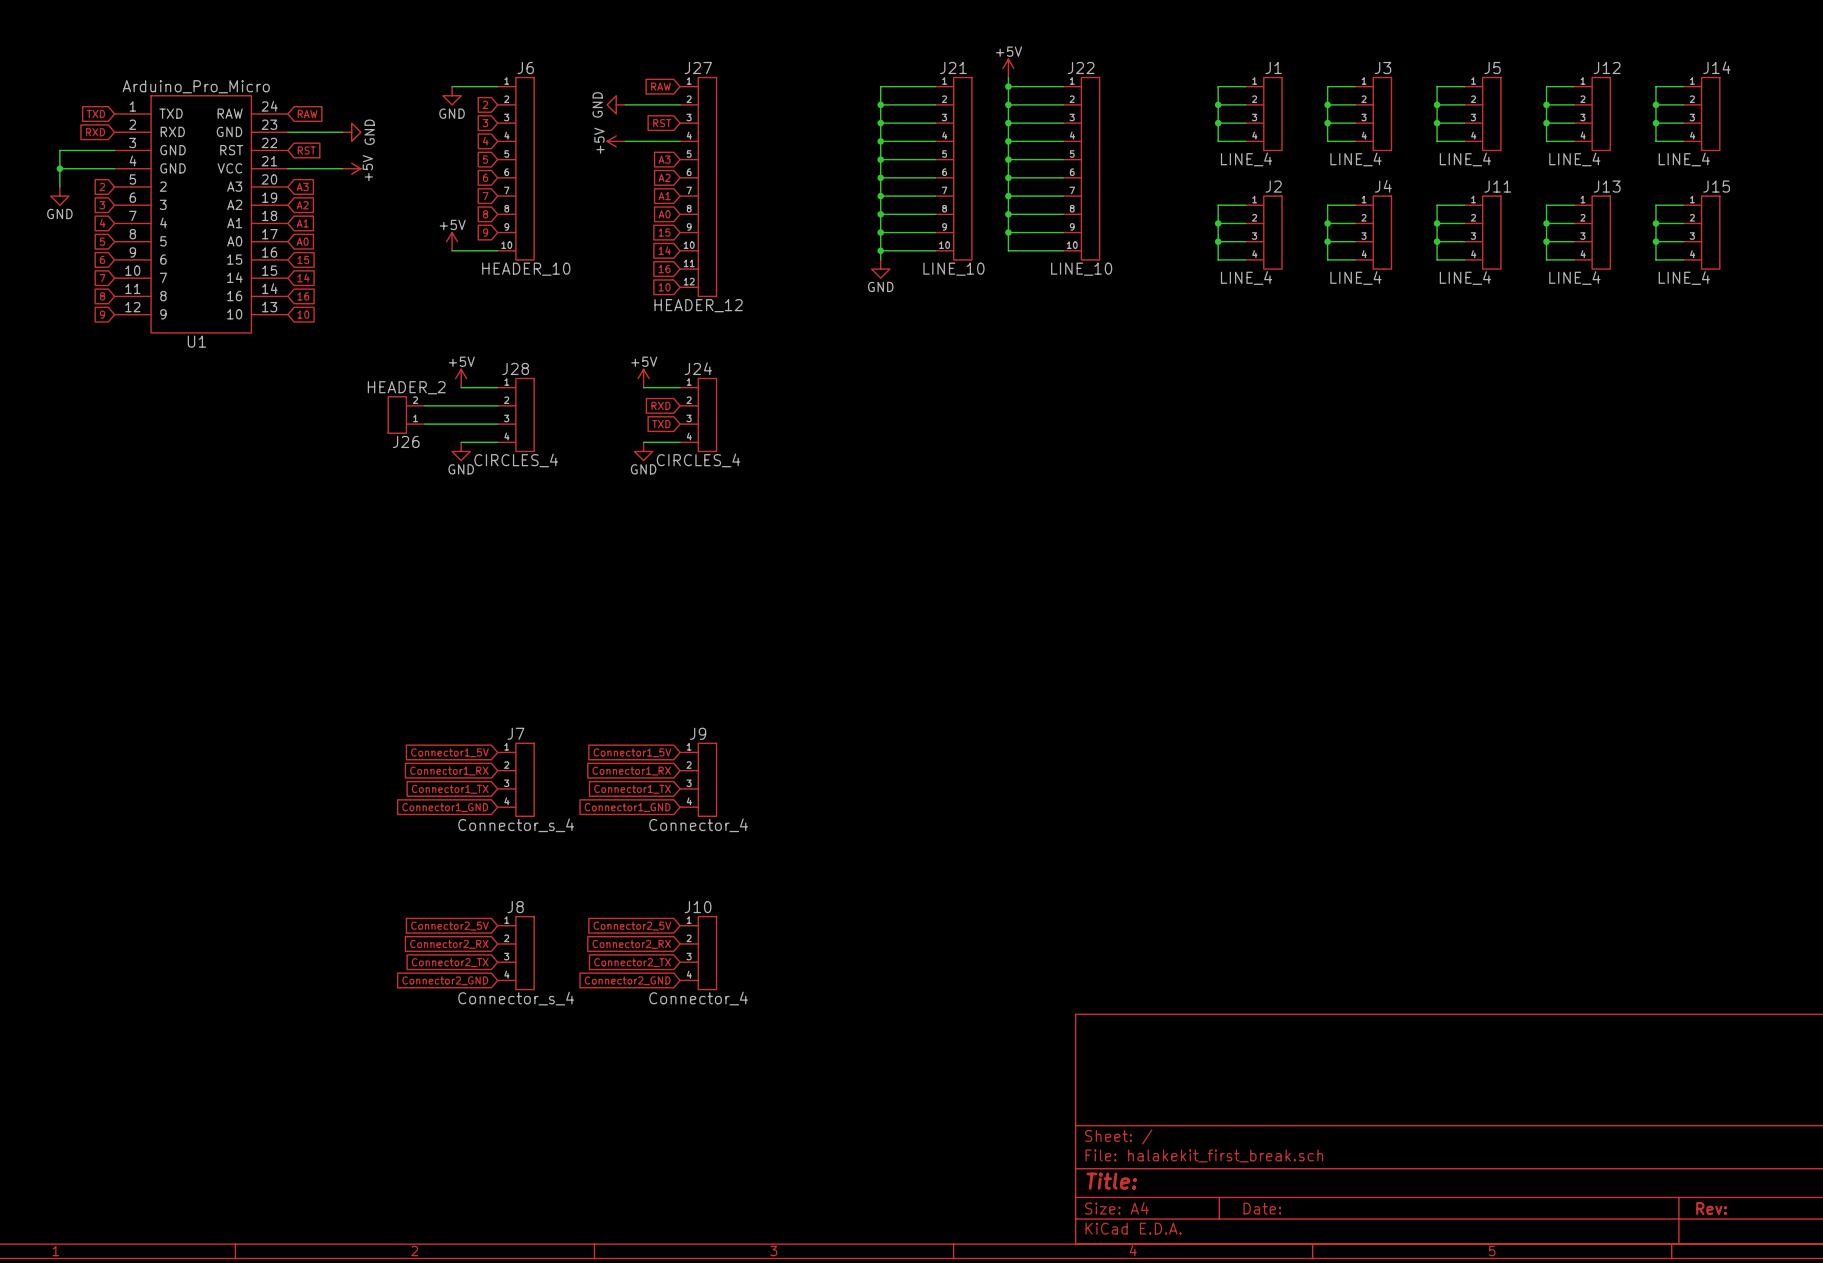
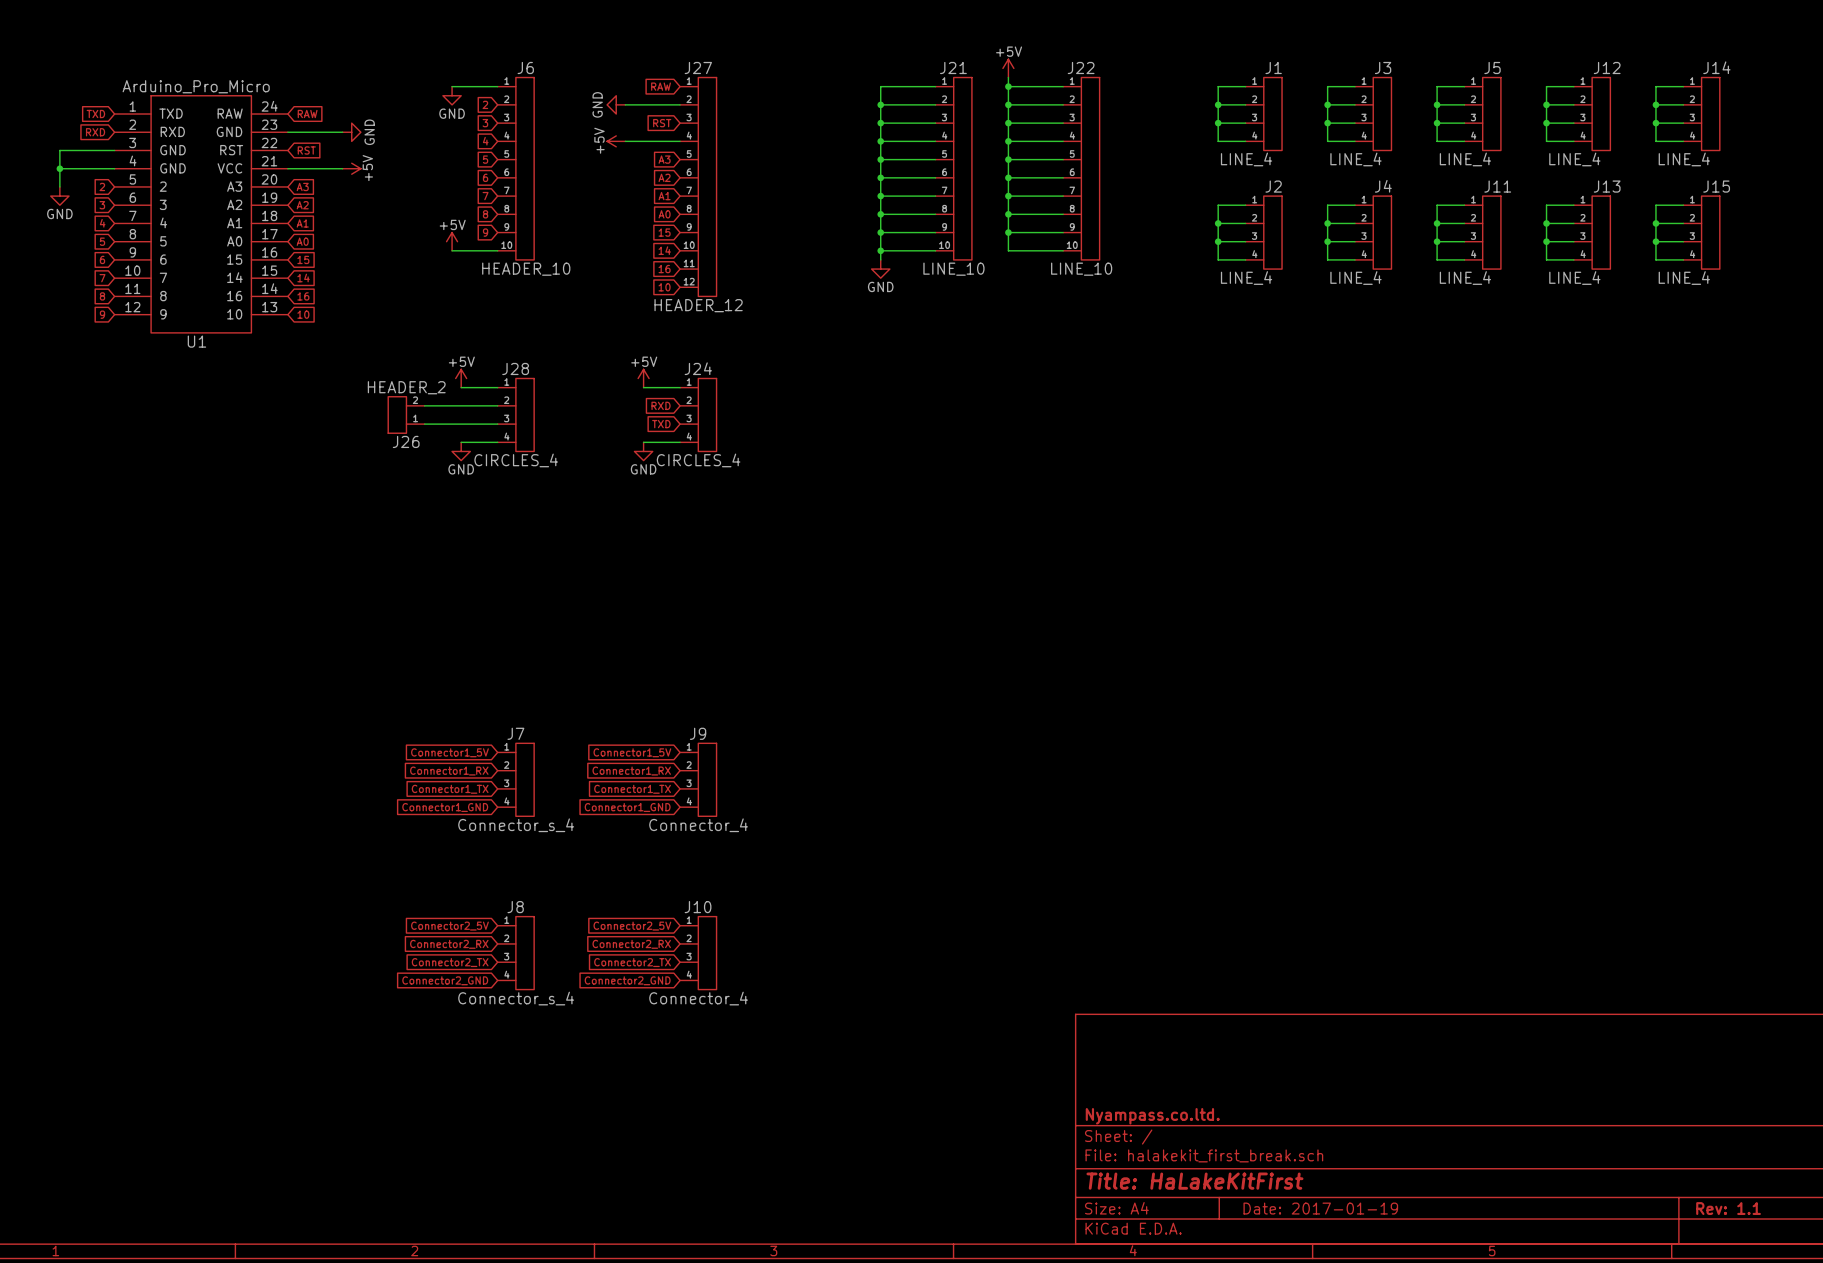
title block: none -> Nyampass.co.ltd. (1152, 1116)
title block: Title: (1111, 1181) -> Title: HaLakeKitFirst (1194, 1181)
title block: Date: (1262, 1208) -> Date: 2017-01-19 (1320, 1208)
title block: Rev: (1711, 1208) -> Rev: 1.1 (1728, 1208)

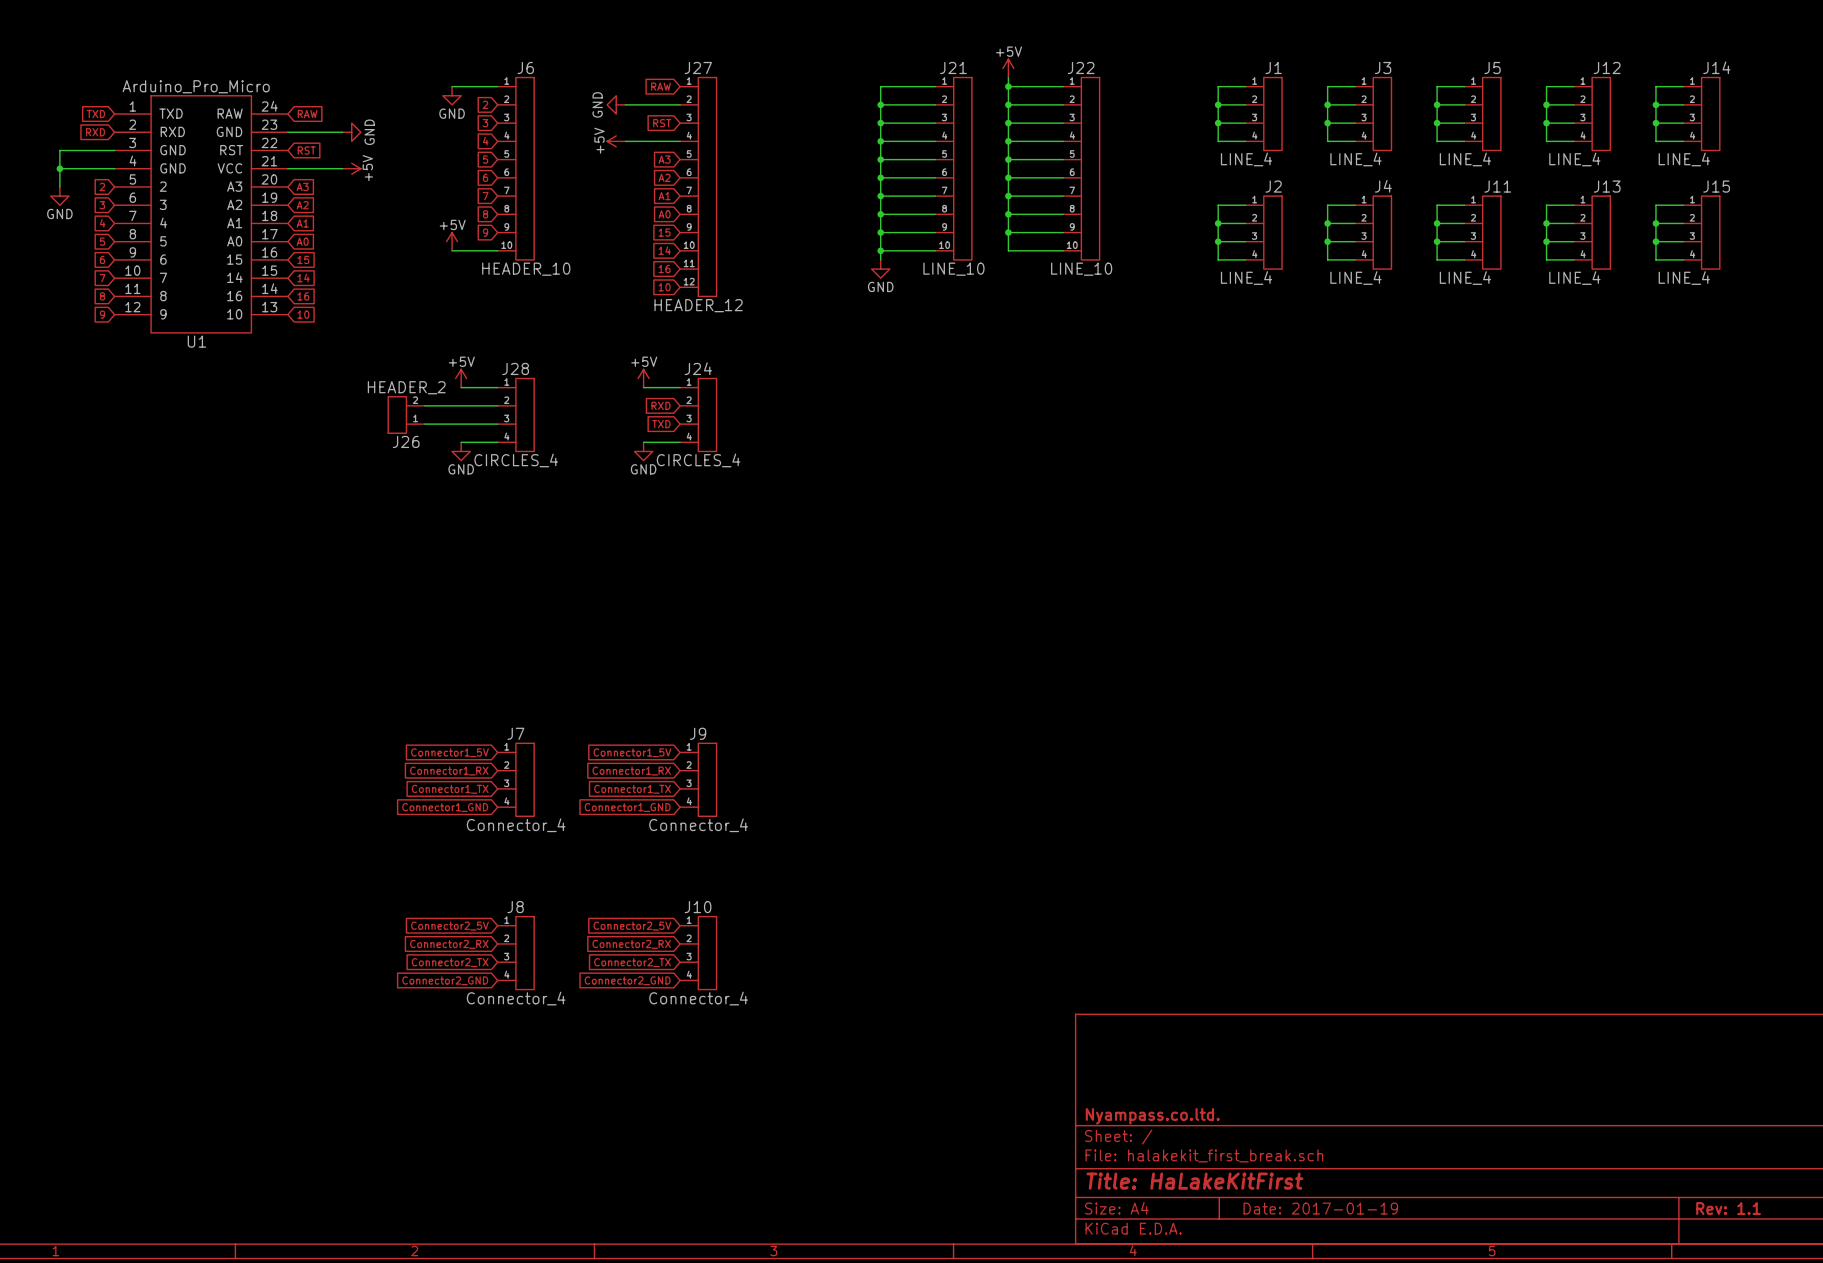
J7 value: Connector_s_4 (516, 825) -> Connector_4 (516, 825)
J8 value: Connector_s_4 (516, 998) -> Connector_4 (516, 998)

